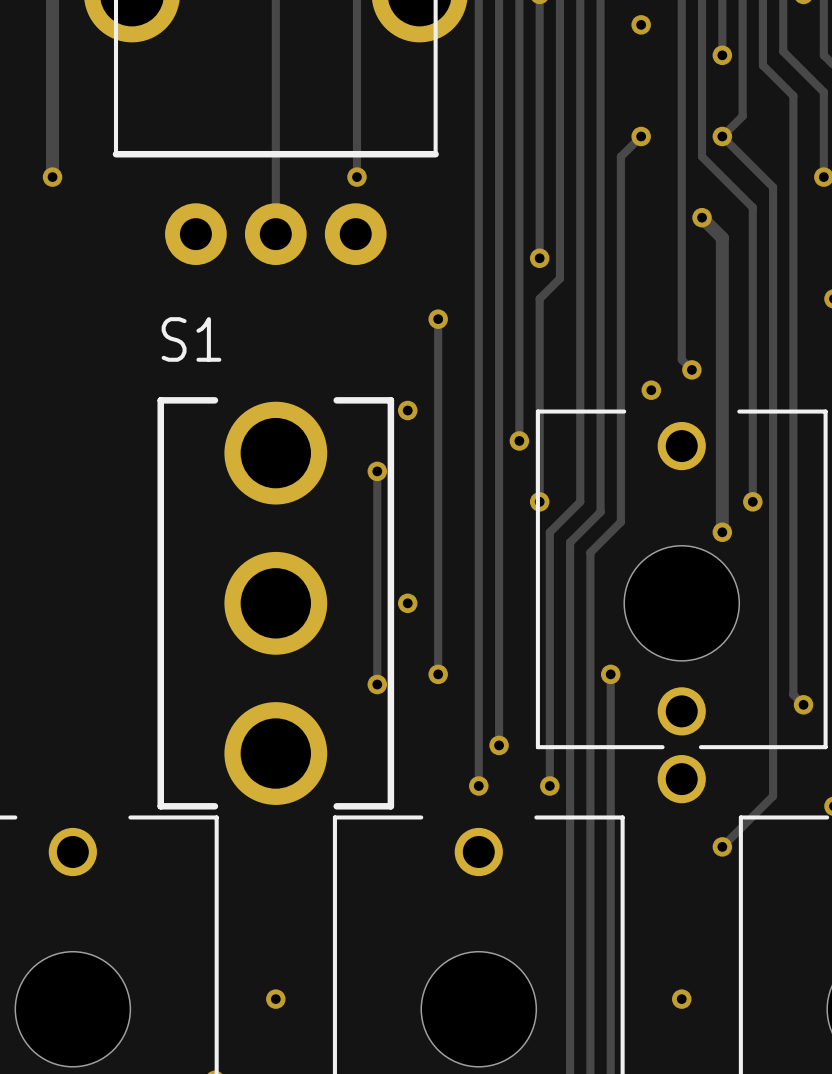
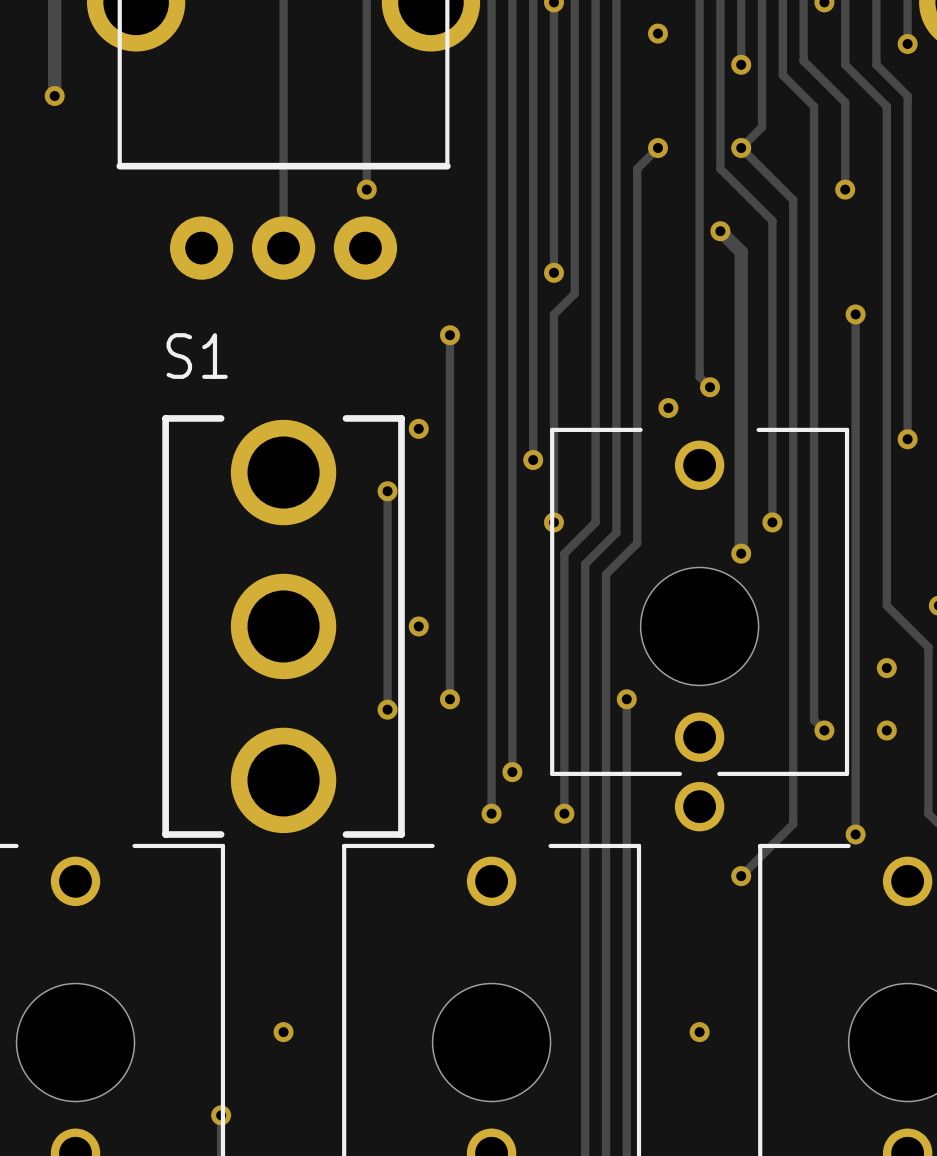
track: (52, 85) (52, 177) -> none
via position: (52, 177) -> (54, 95)

